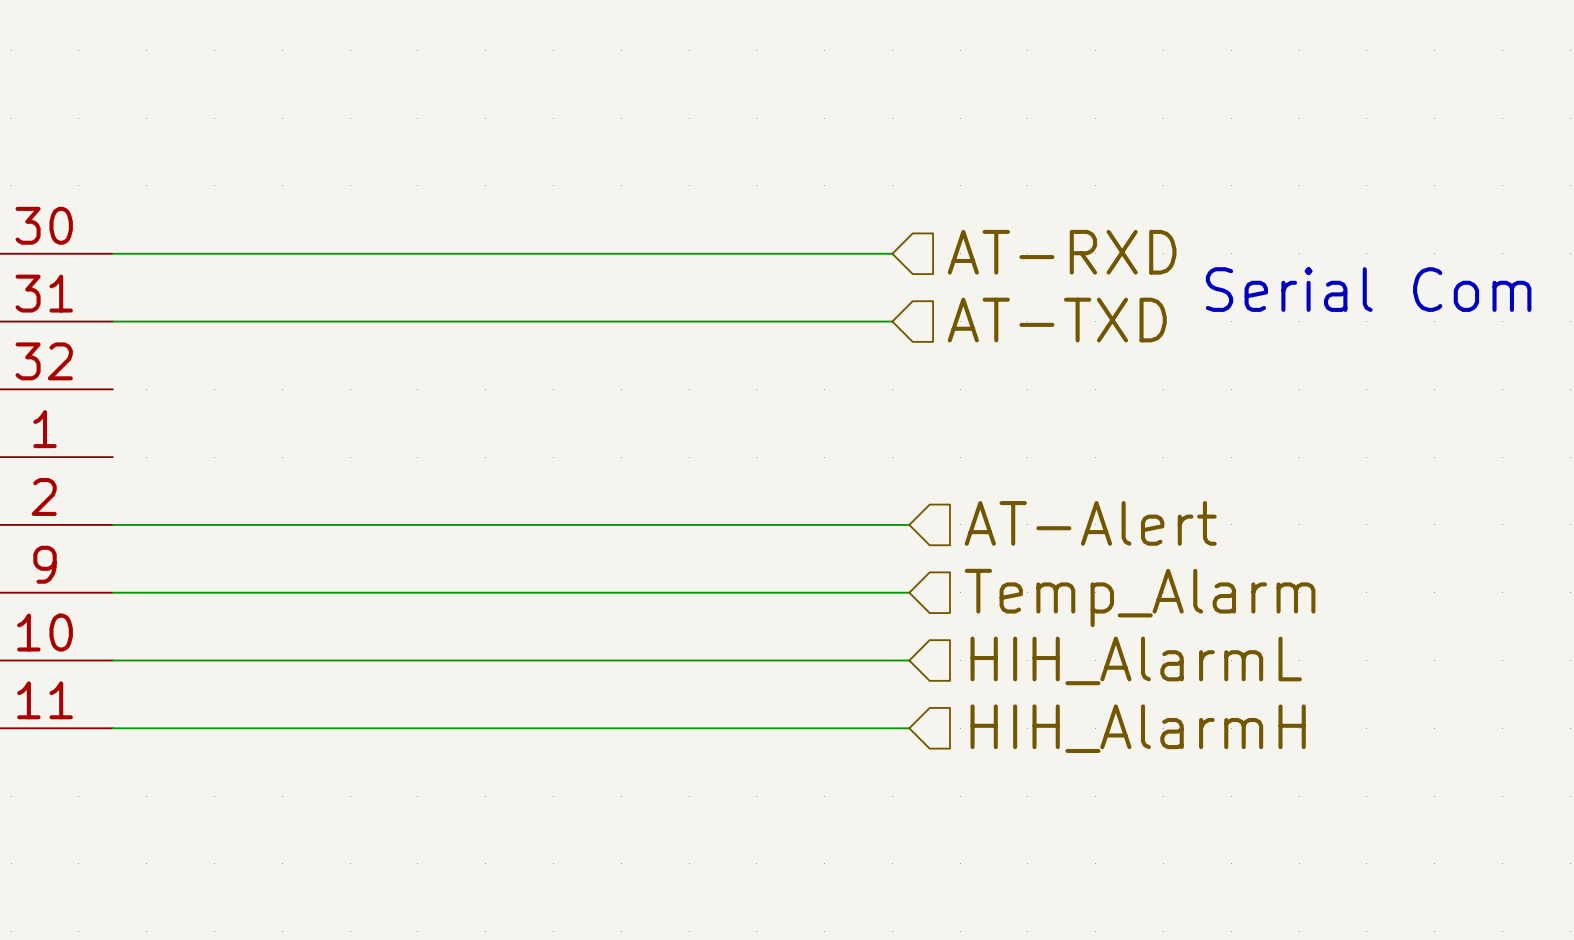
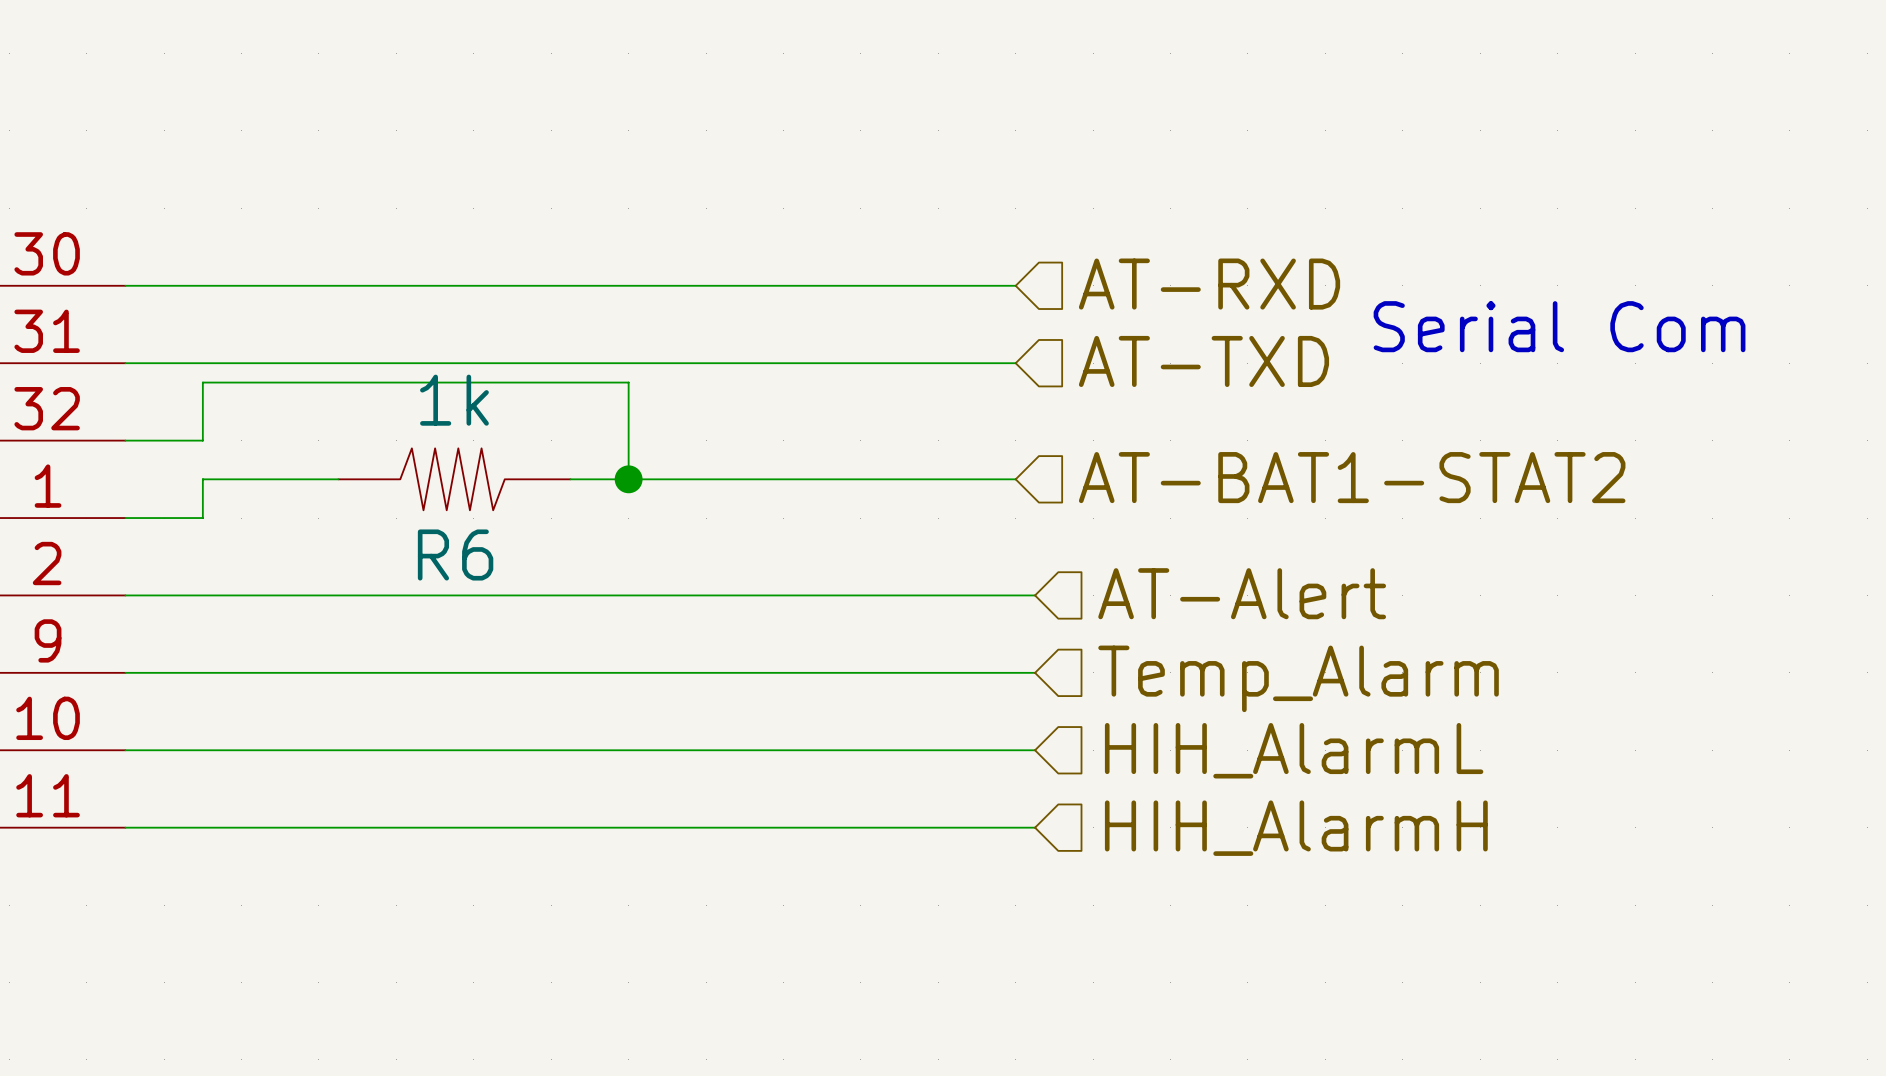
wire: none -> (125, 440) (202, 440) (202, 382) (628, 382) (628, 479)
hierarchical label: none -> AT-BAT1-STAT2 (1352, 477)
wire: none -> (338, 479) (202, 479) (202, 518) (125, 518)
R6: none -> 1k (454, 479)
wire: none -> (570, 479) (1015, 479)
junction: none -> (628, 479)

